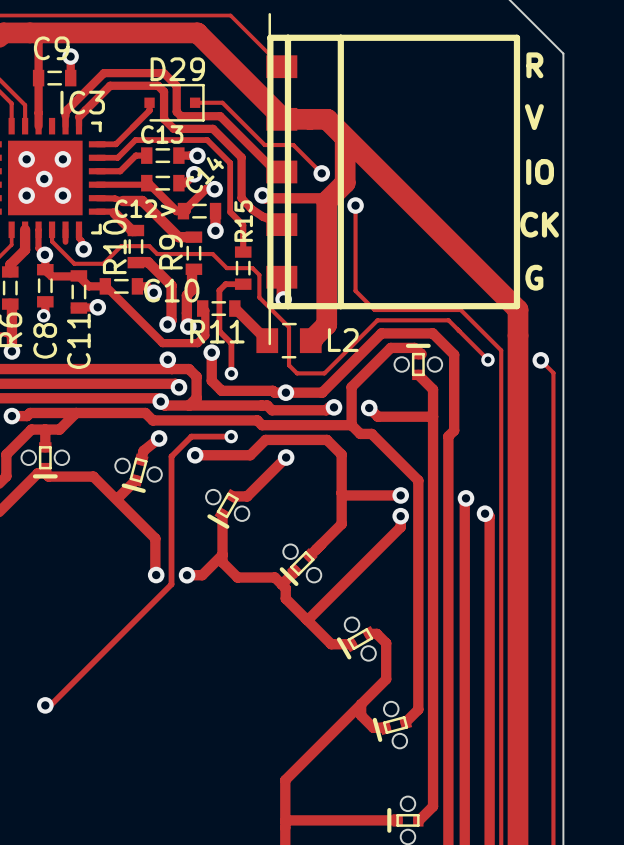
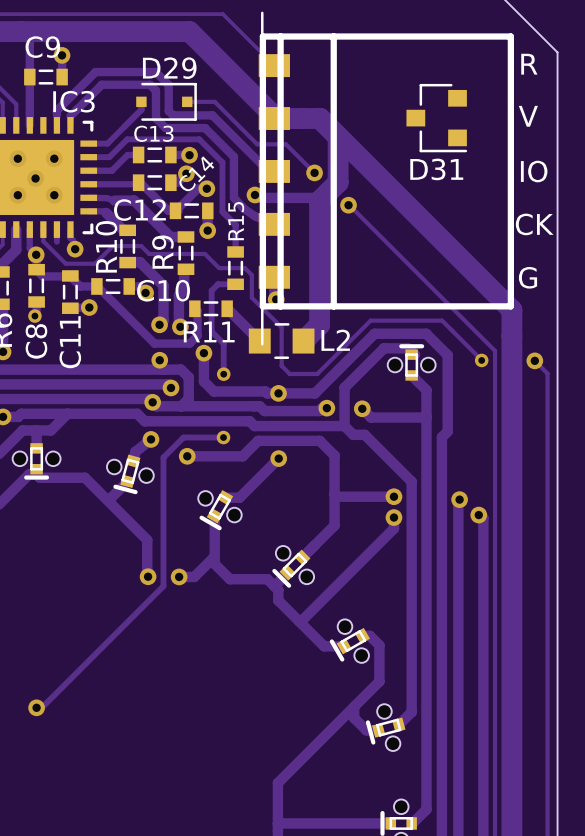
D31: none -> (436, 118)
track: (355, 205) (355, 290) (374, 309) (460, 309) -> (348, 205) (454, 310)
C12 name: C12> (145, 208) -> C12 (139, 210)

